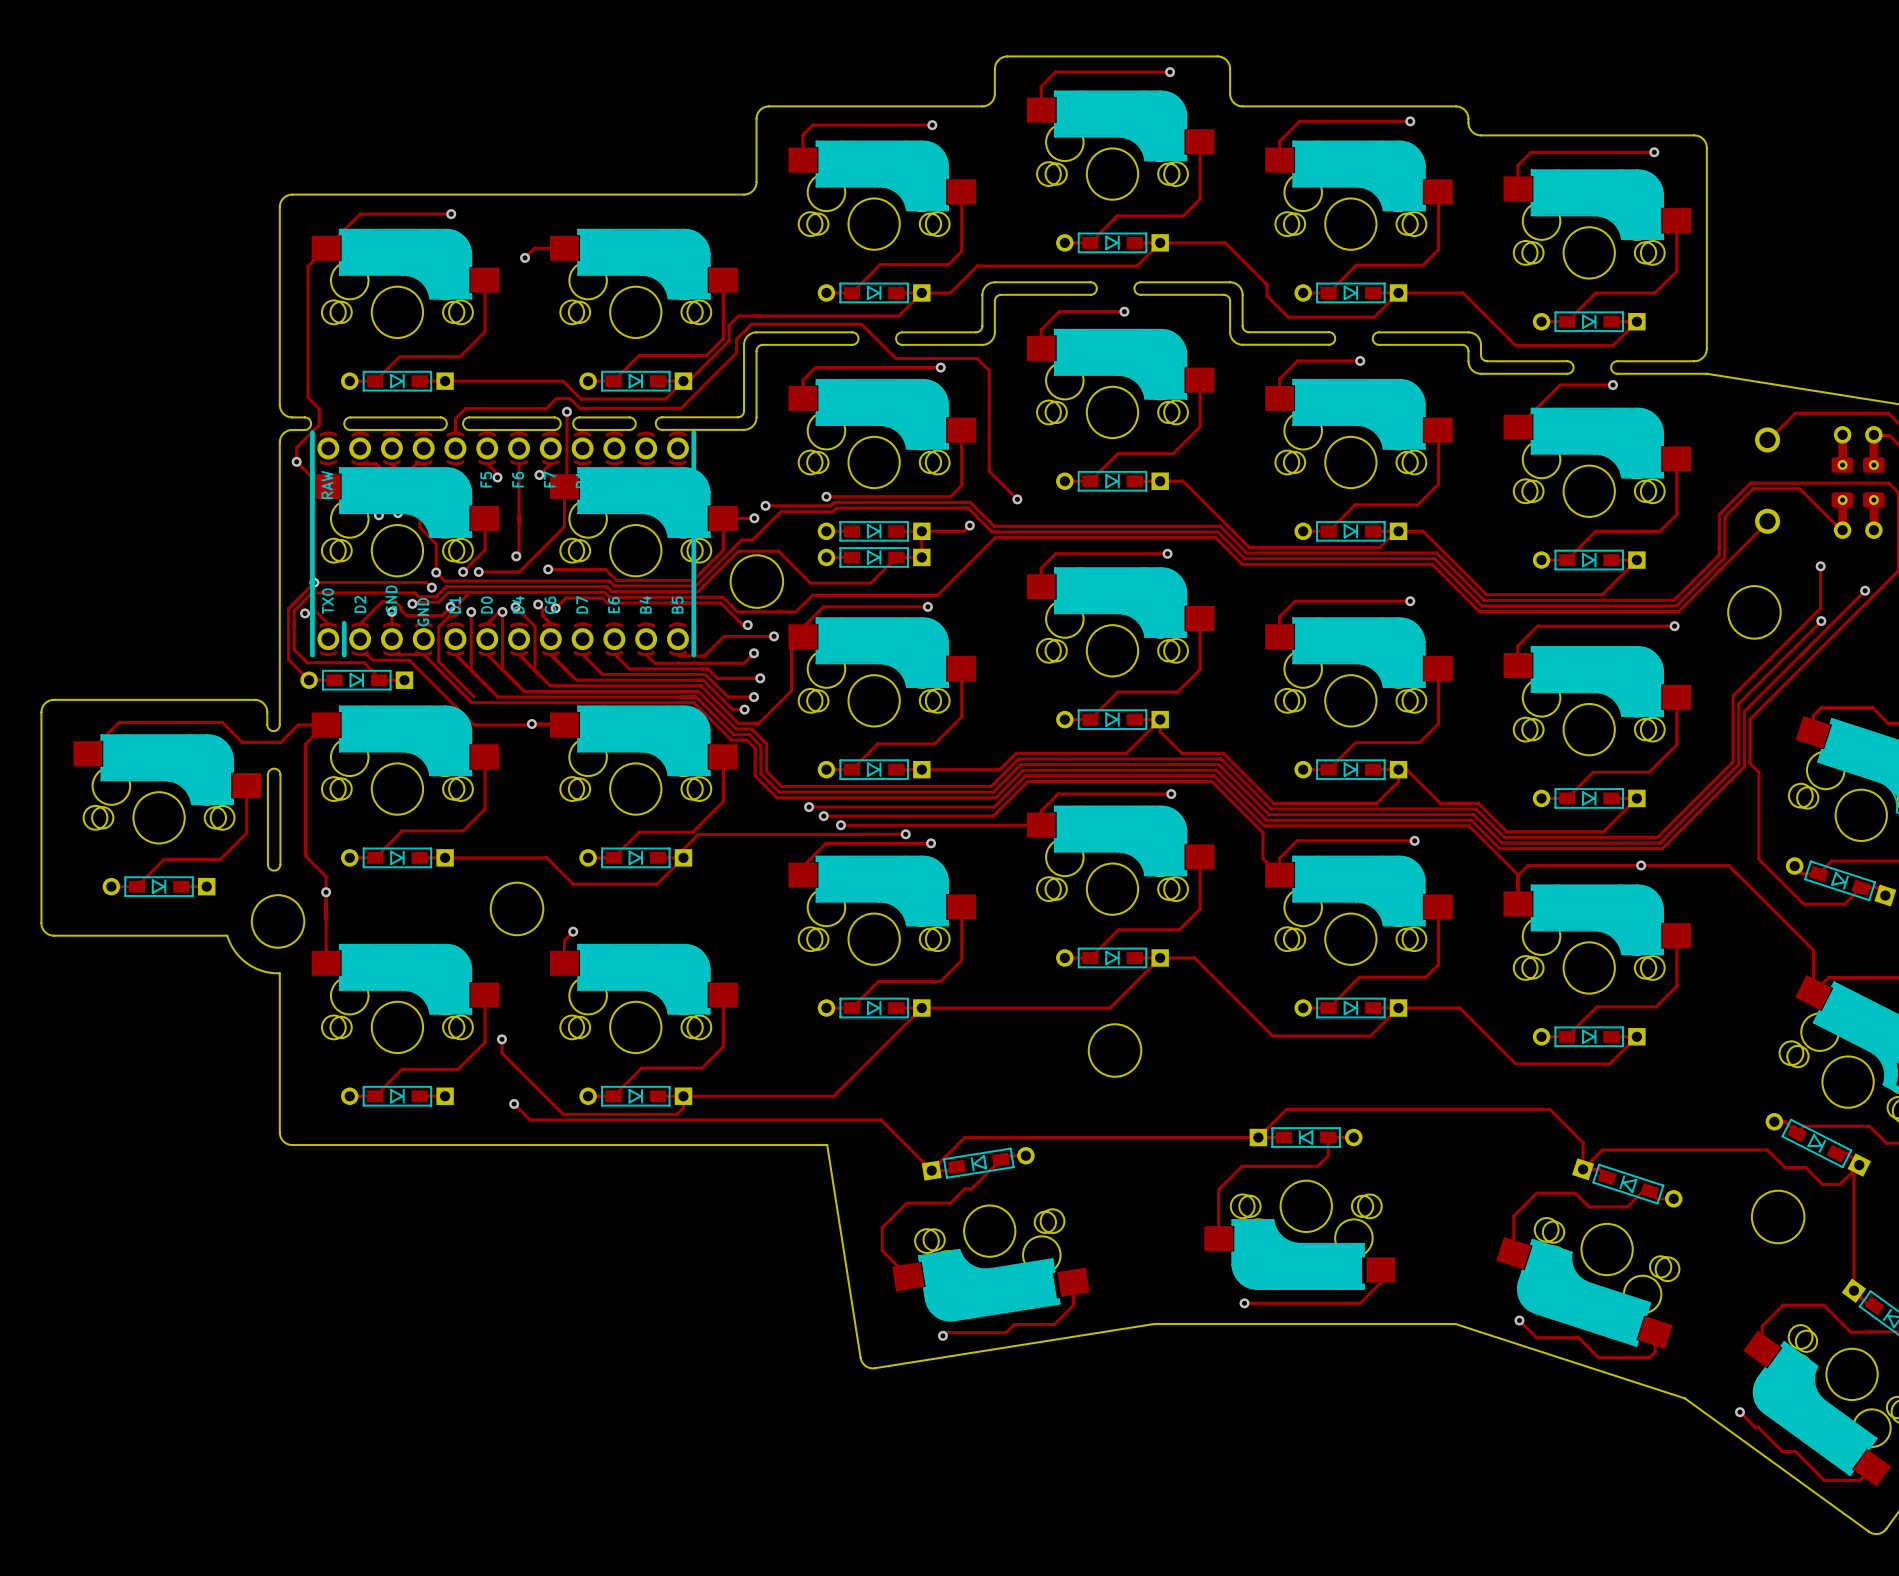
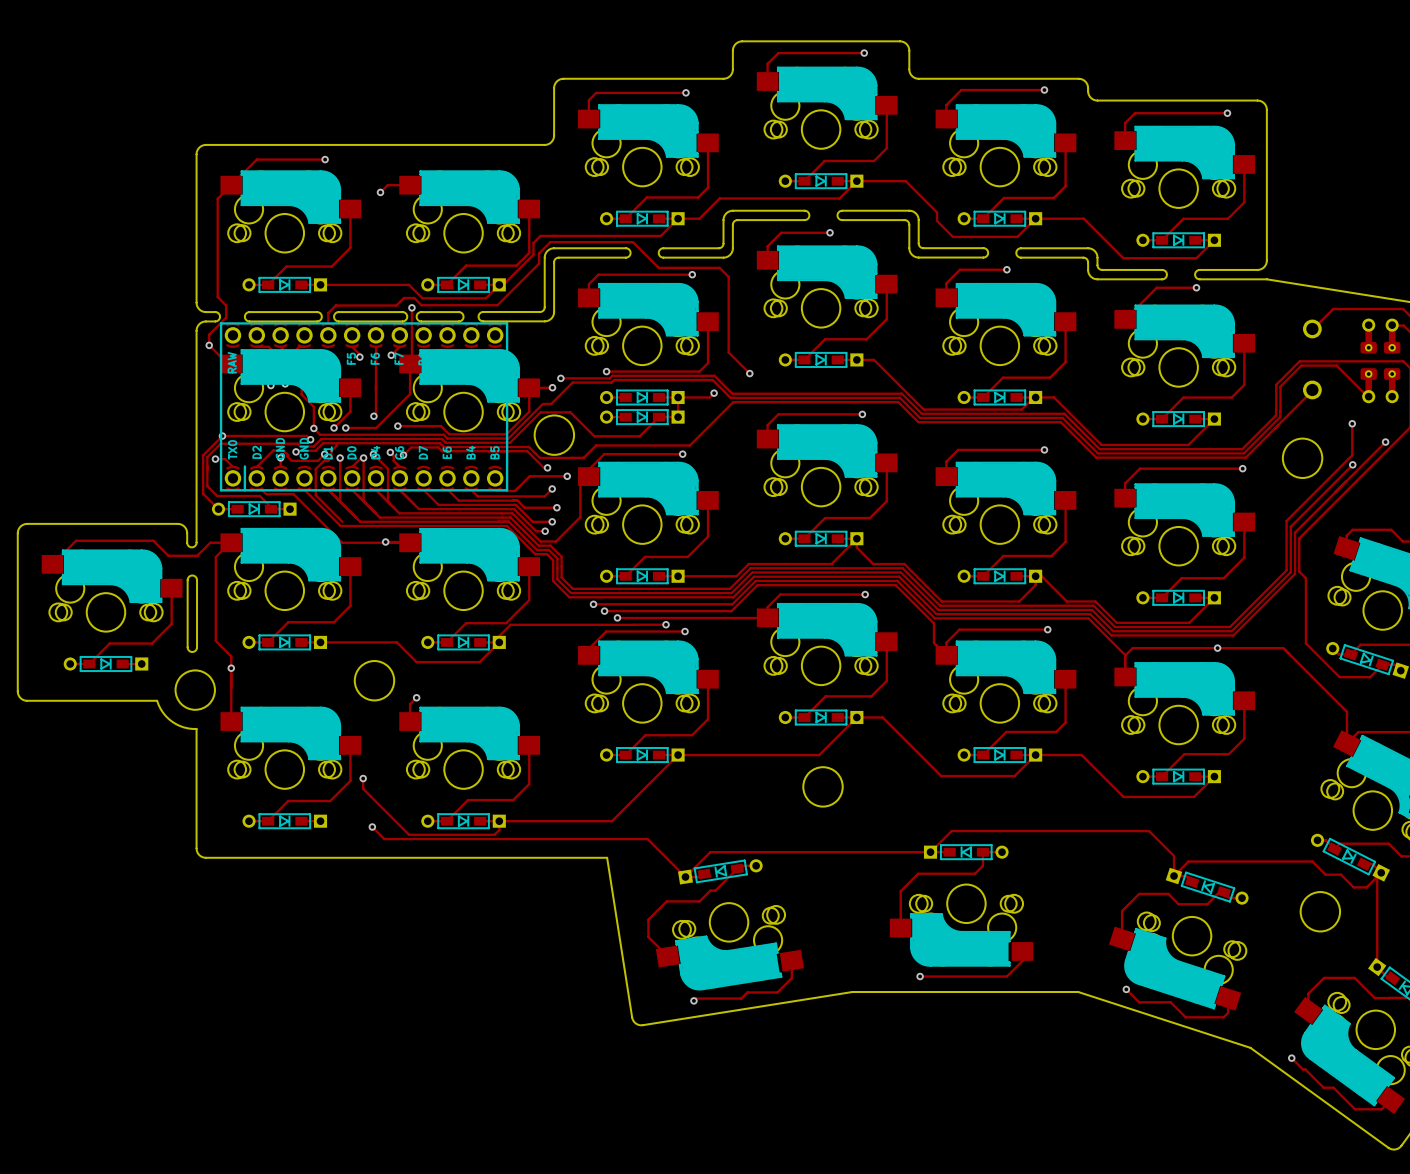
part footprint: [310, 430, 697, 658] -> [219, 322, 509, 492]

